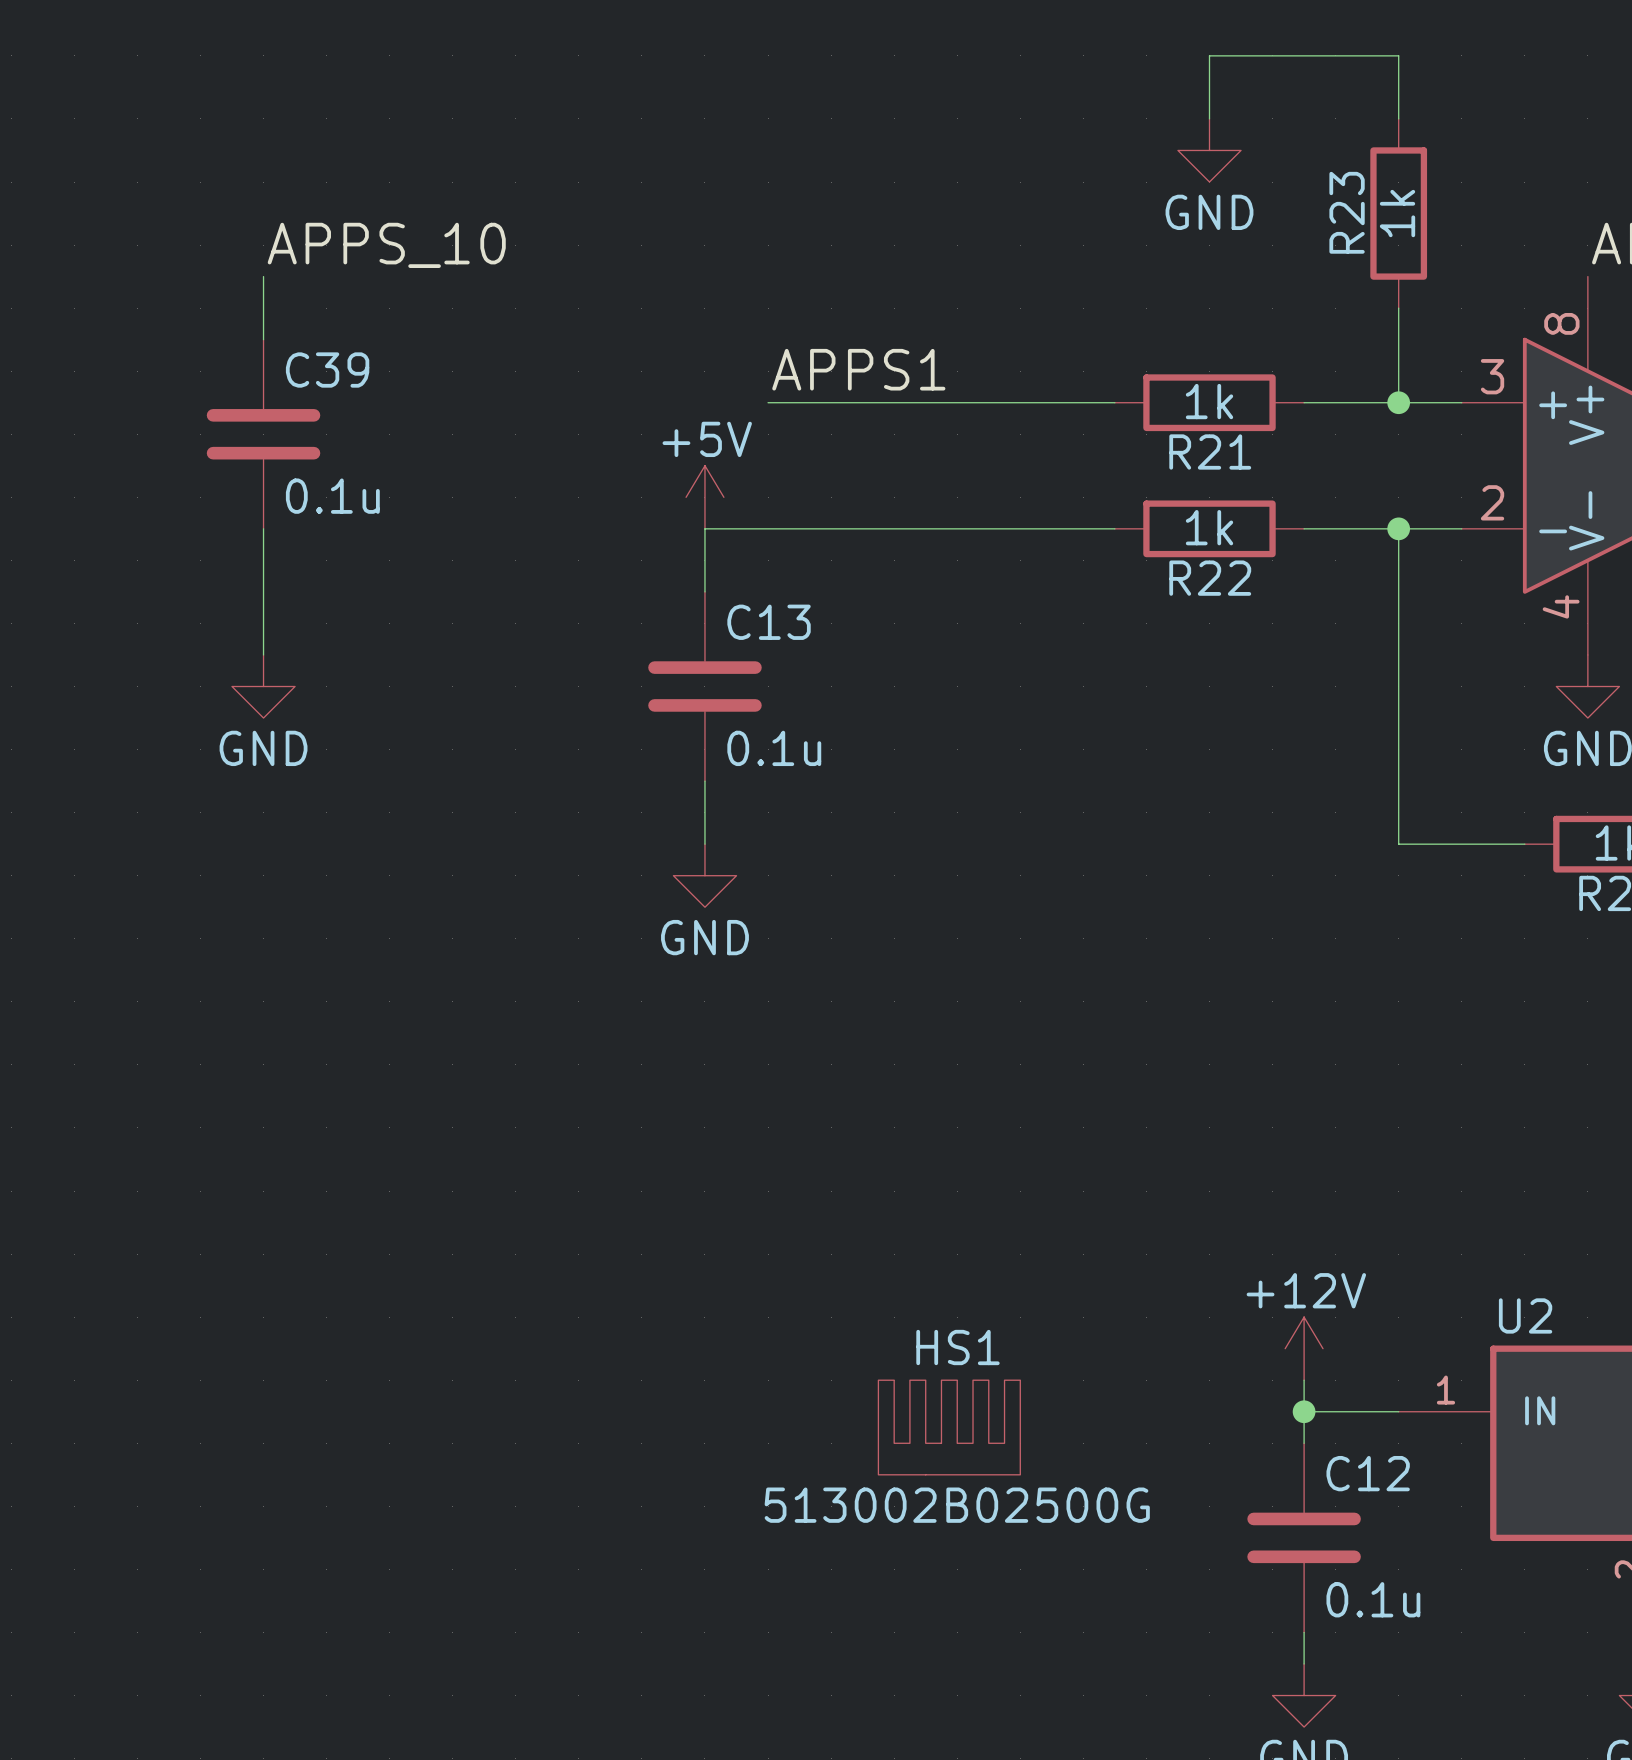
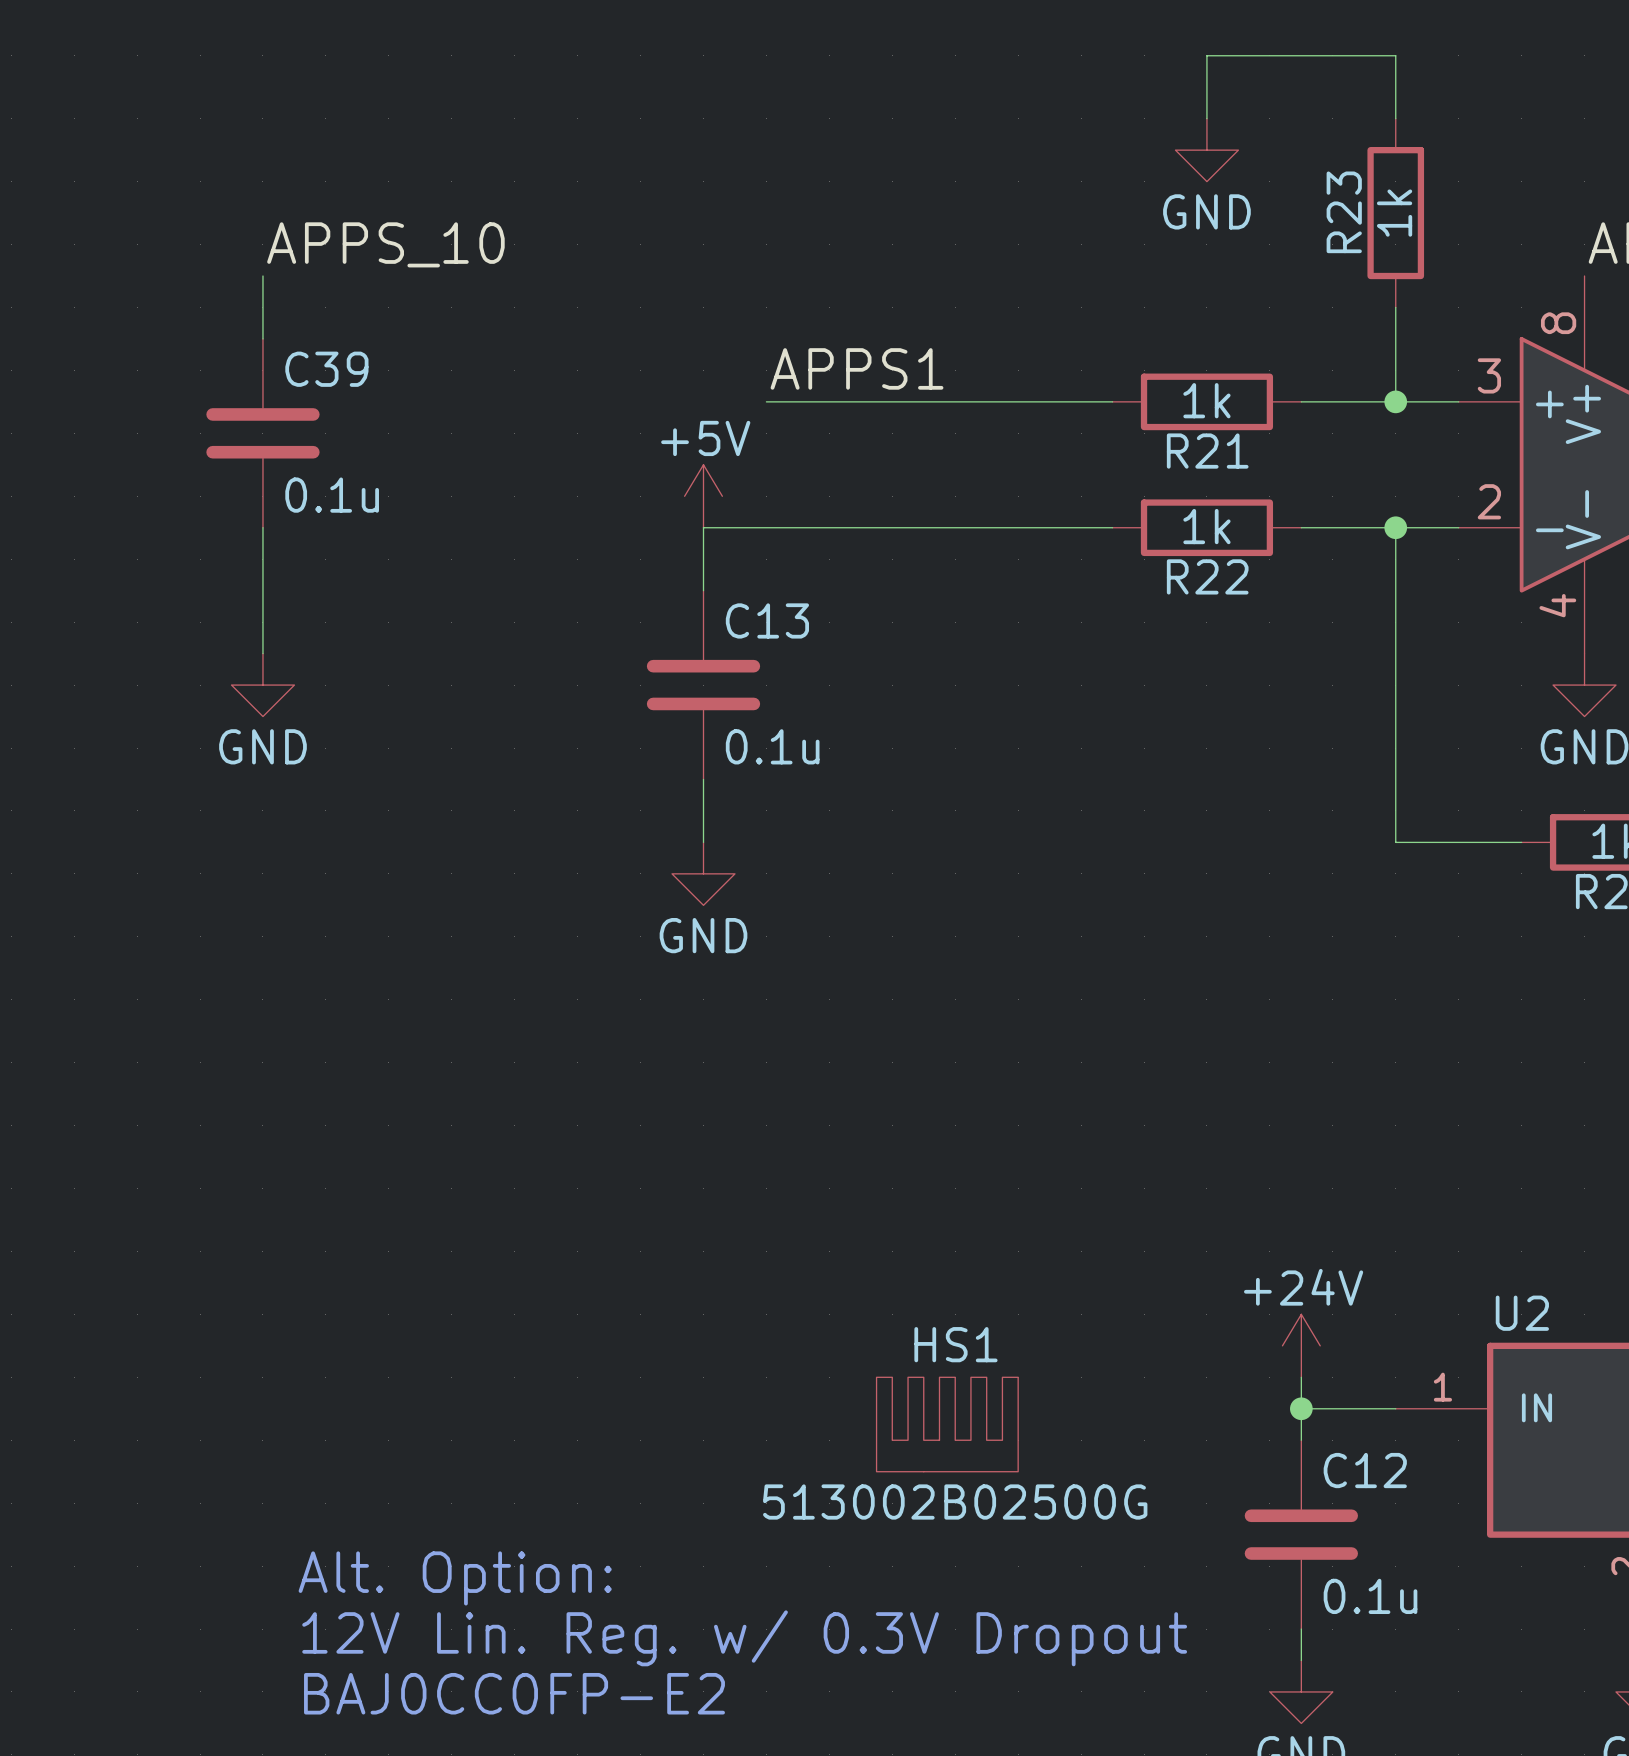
power symbol: +12V (1304, 1348) -> +24V (1301, 1345)
text: none -> Alt. Option: (455, 1578)
text: none -> 12V Lin. Reg. w/ 0.3V Dropout (744, 1638)
text: none -> BAJ0CC0FP-E2 (514, 1693)

